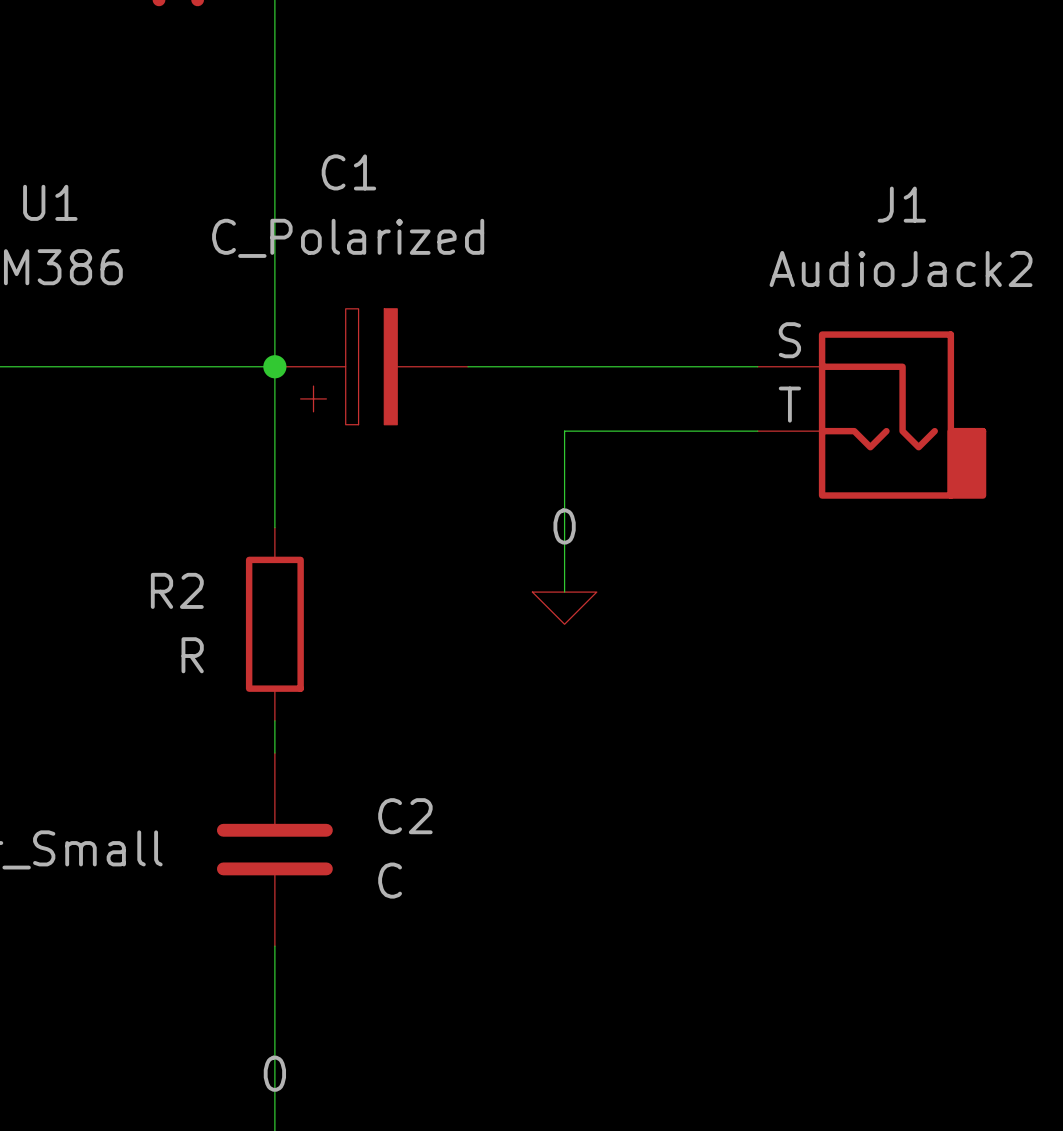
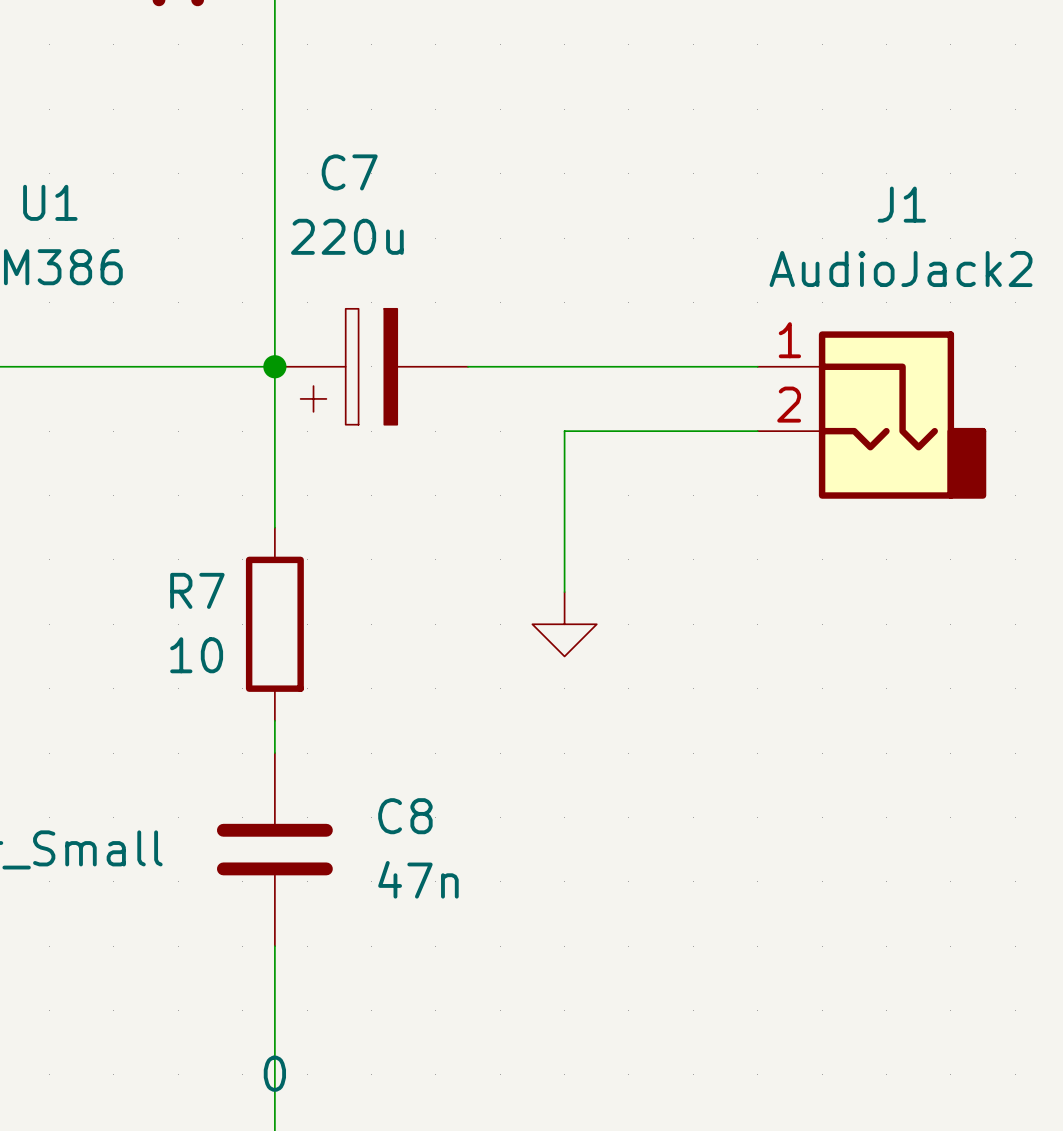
C1 name: C1 (348, 172) -> C7 (349, 172)
C1 value: C_Polarized (348, 238) -> 220u (347, 236)
J1 pin number: S (789, 340) -> 1 (789, 340)
J1 pin number: T (789, 404) -> 2 (789, 404)
power symbol text: 0 (564, 526) -> none
R2 name: R2 (177, 590) -> R7 (197, 590)
power symbol shape: [532, 592, 597, 625] -> [532, 592, 597, 657]
R2 value: R (192, 655) -> 10 (196, 655)
C2 name: C2 (405, 816) -> C8 (405, 816)
C2 value: C (390, 880) -> 47n (418, 879)

